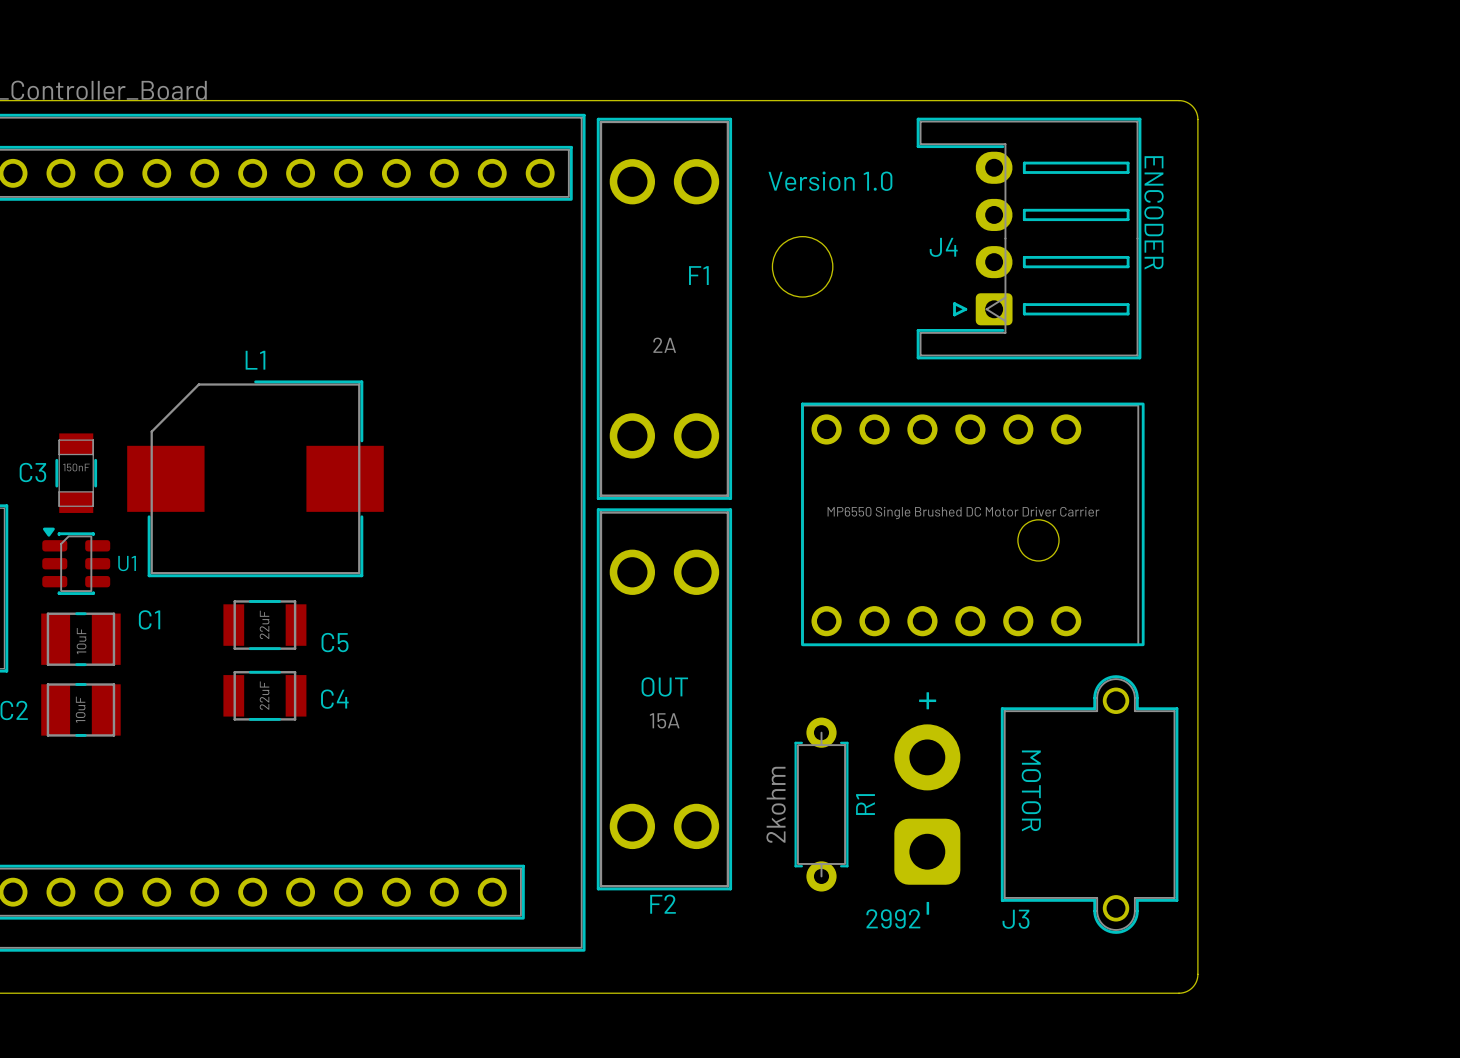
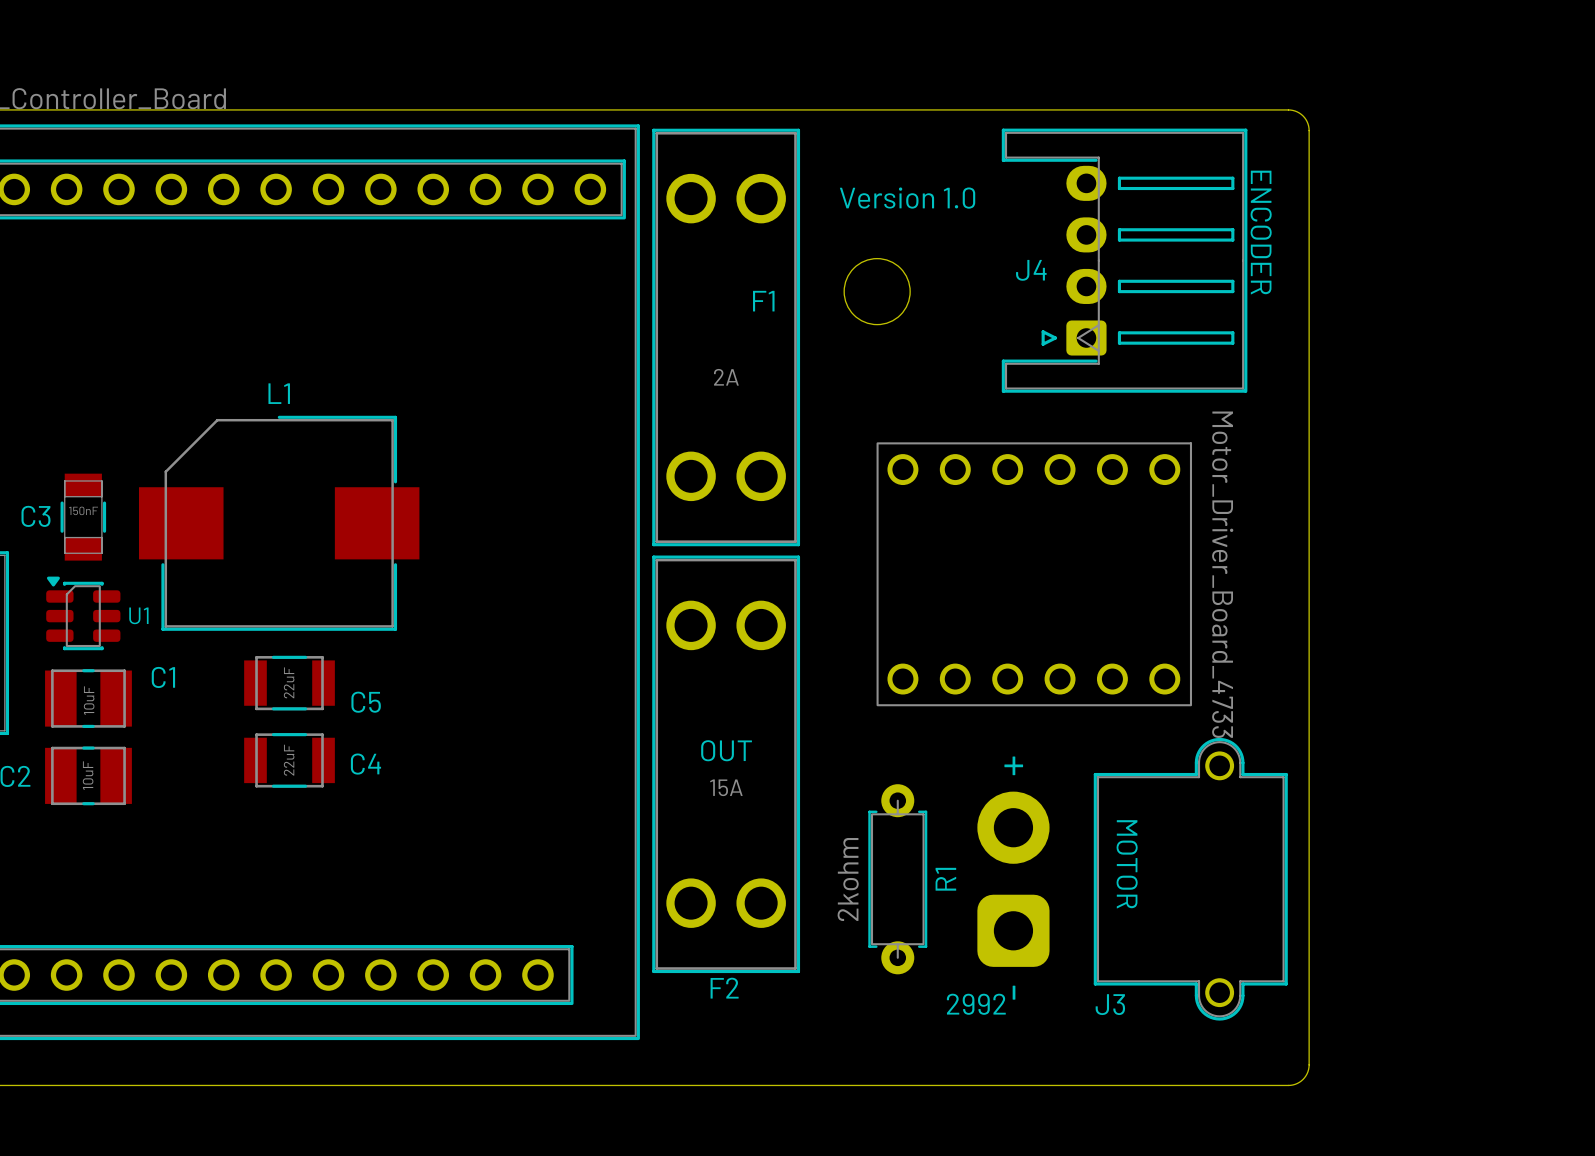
part: MP6550 Single Brushed DC Motor Driver Carrier (972, 524) -> none
part: none -> Motor_Driver_Board_4733 (1034, 574)

